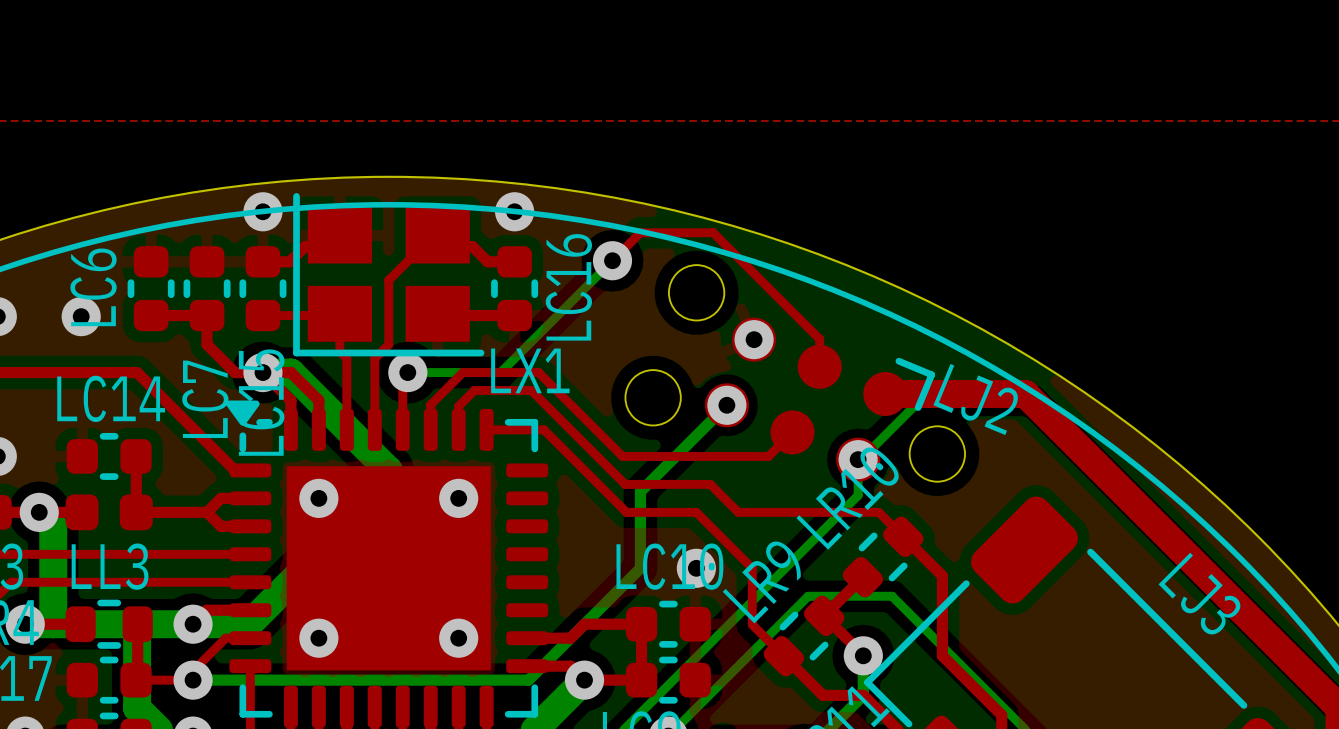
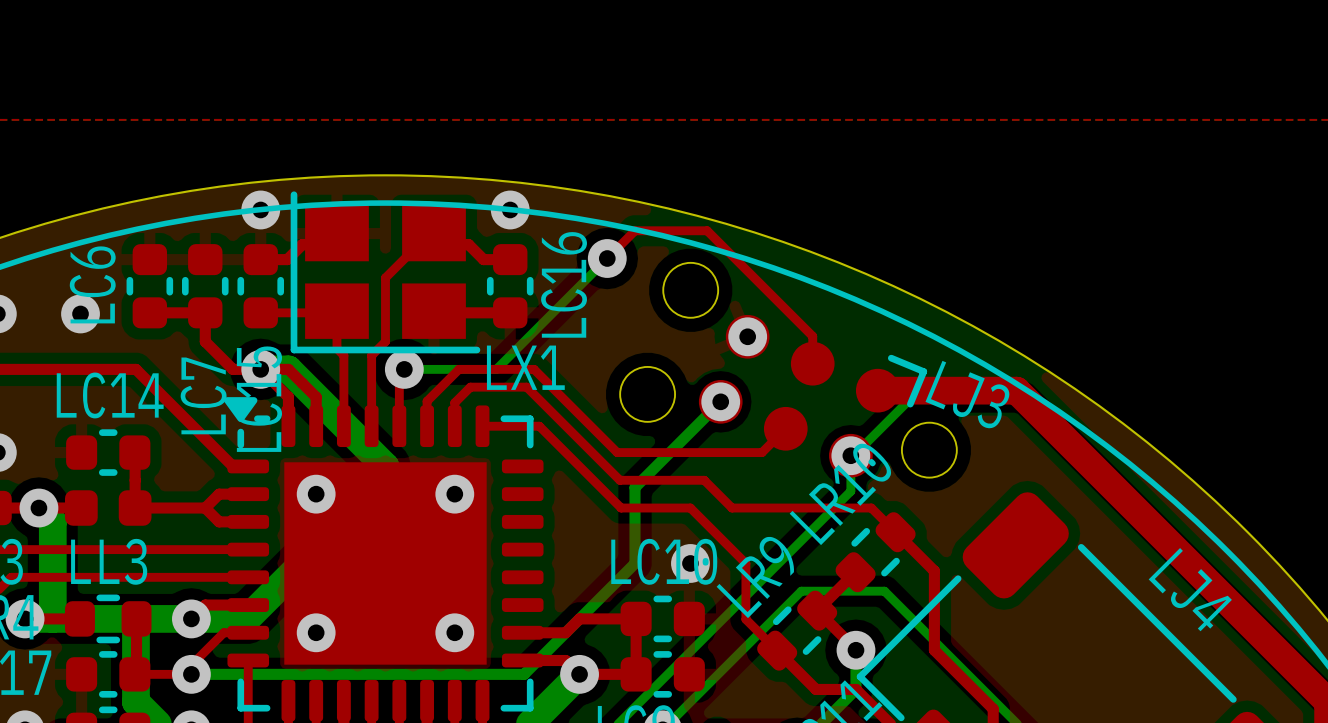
LJ2 name: LJ2 (975, 399) -> LJ3 (967, 394)
LJ3 name: LJ3 (1199, 593) -> LJ4 (1190, 589)

